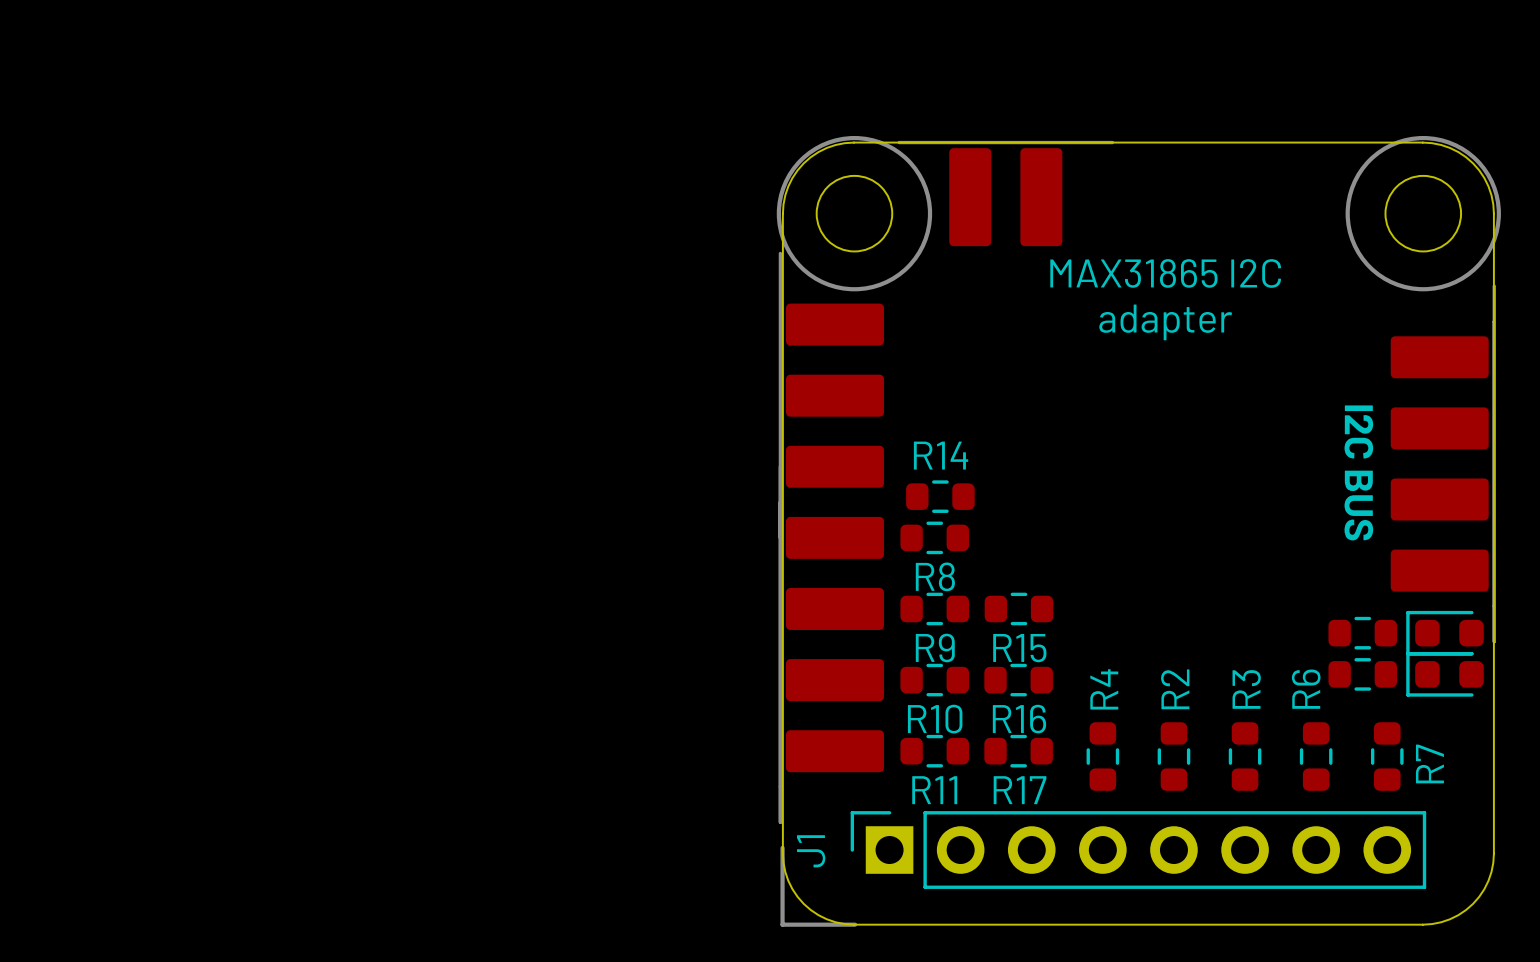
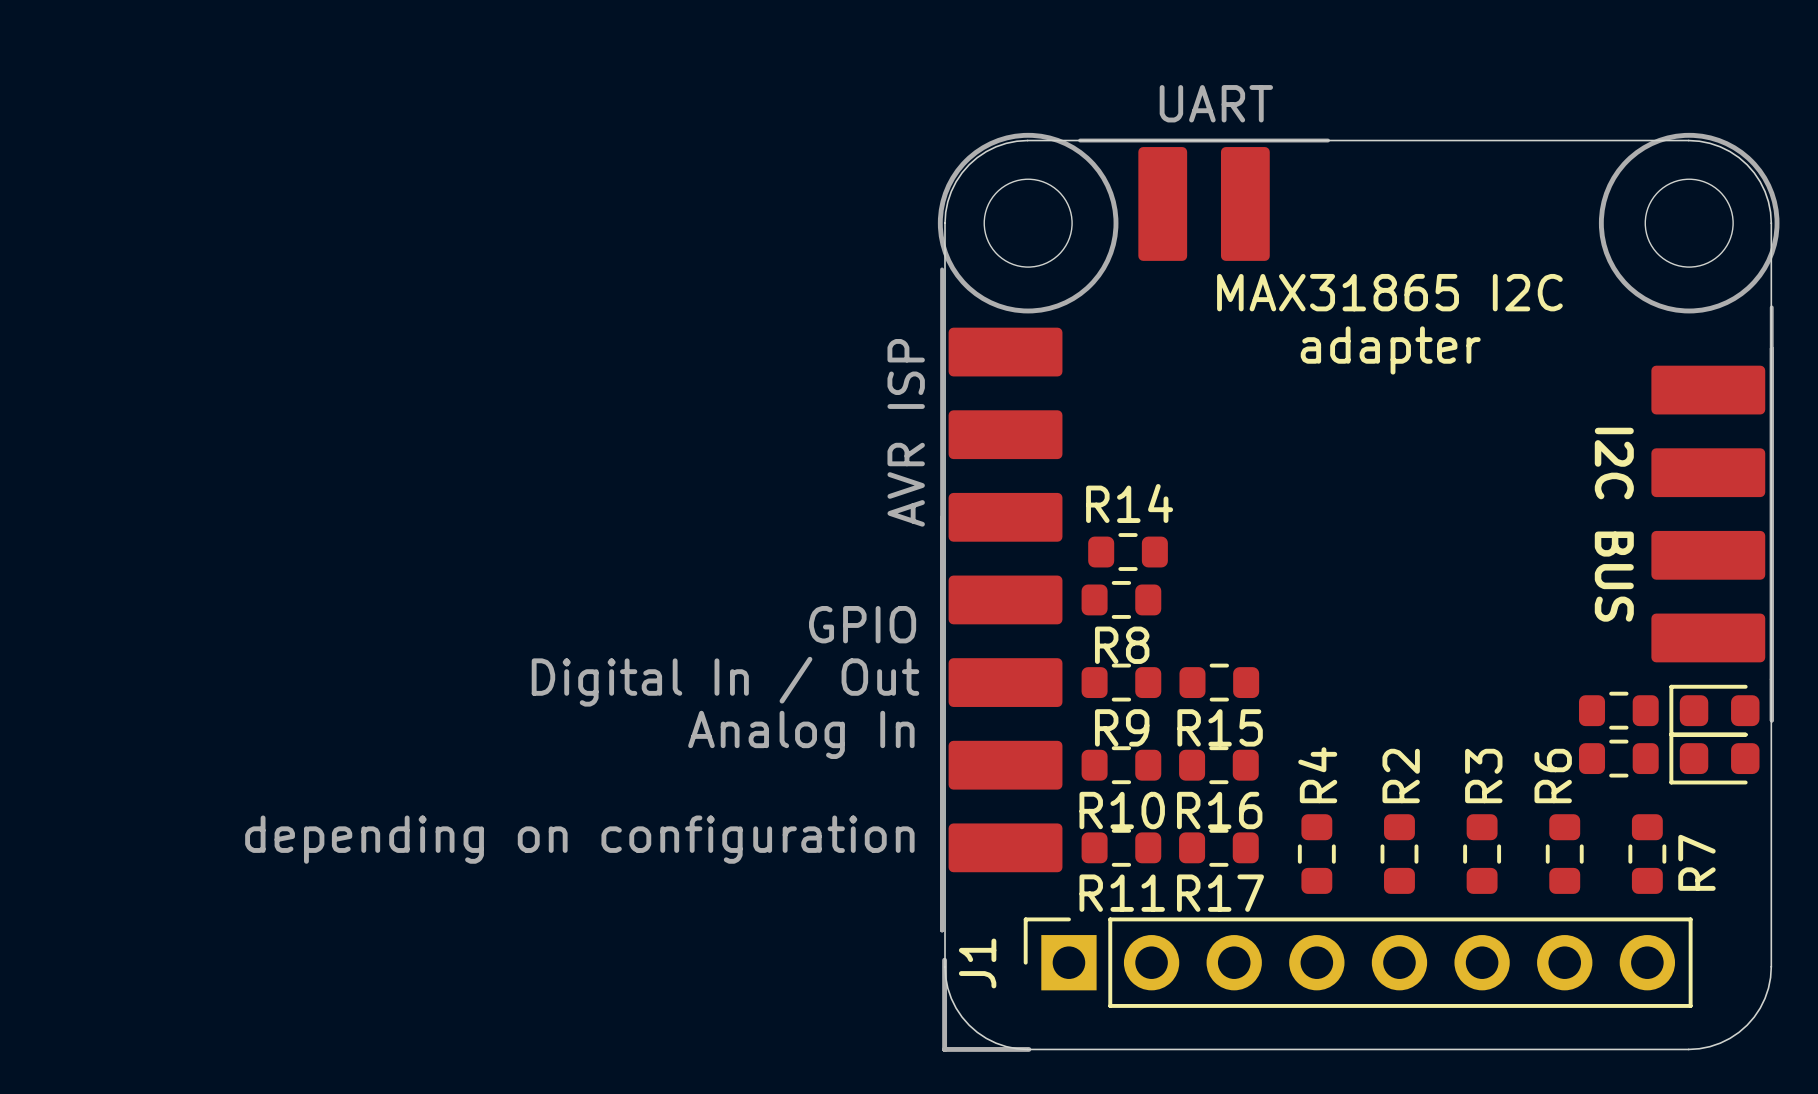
text: none -> UART (1216, 103)
text: none -> AVR ISP (906, 432)
text: none -> GPIO (862, 624)
text: none -> Digital In / Out (725, 681)
text: none -> Analog In (801, 734)
text: none -> depending on configuration (579, 839)

